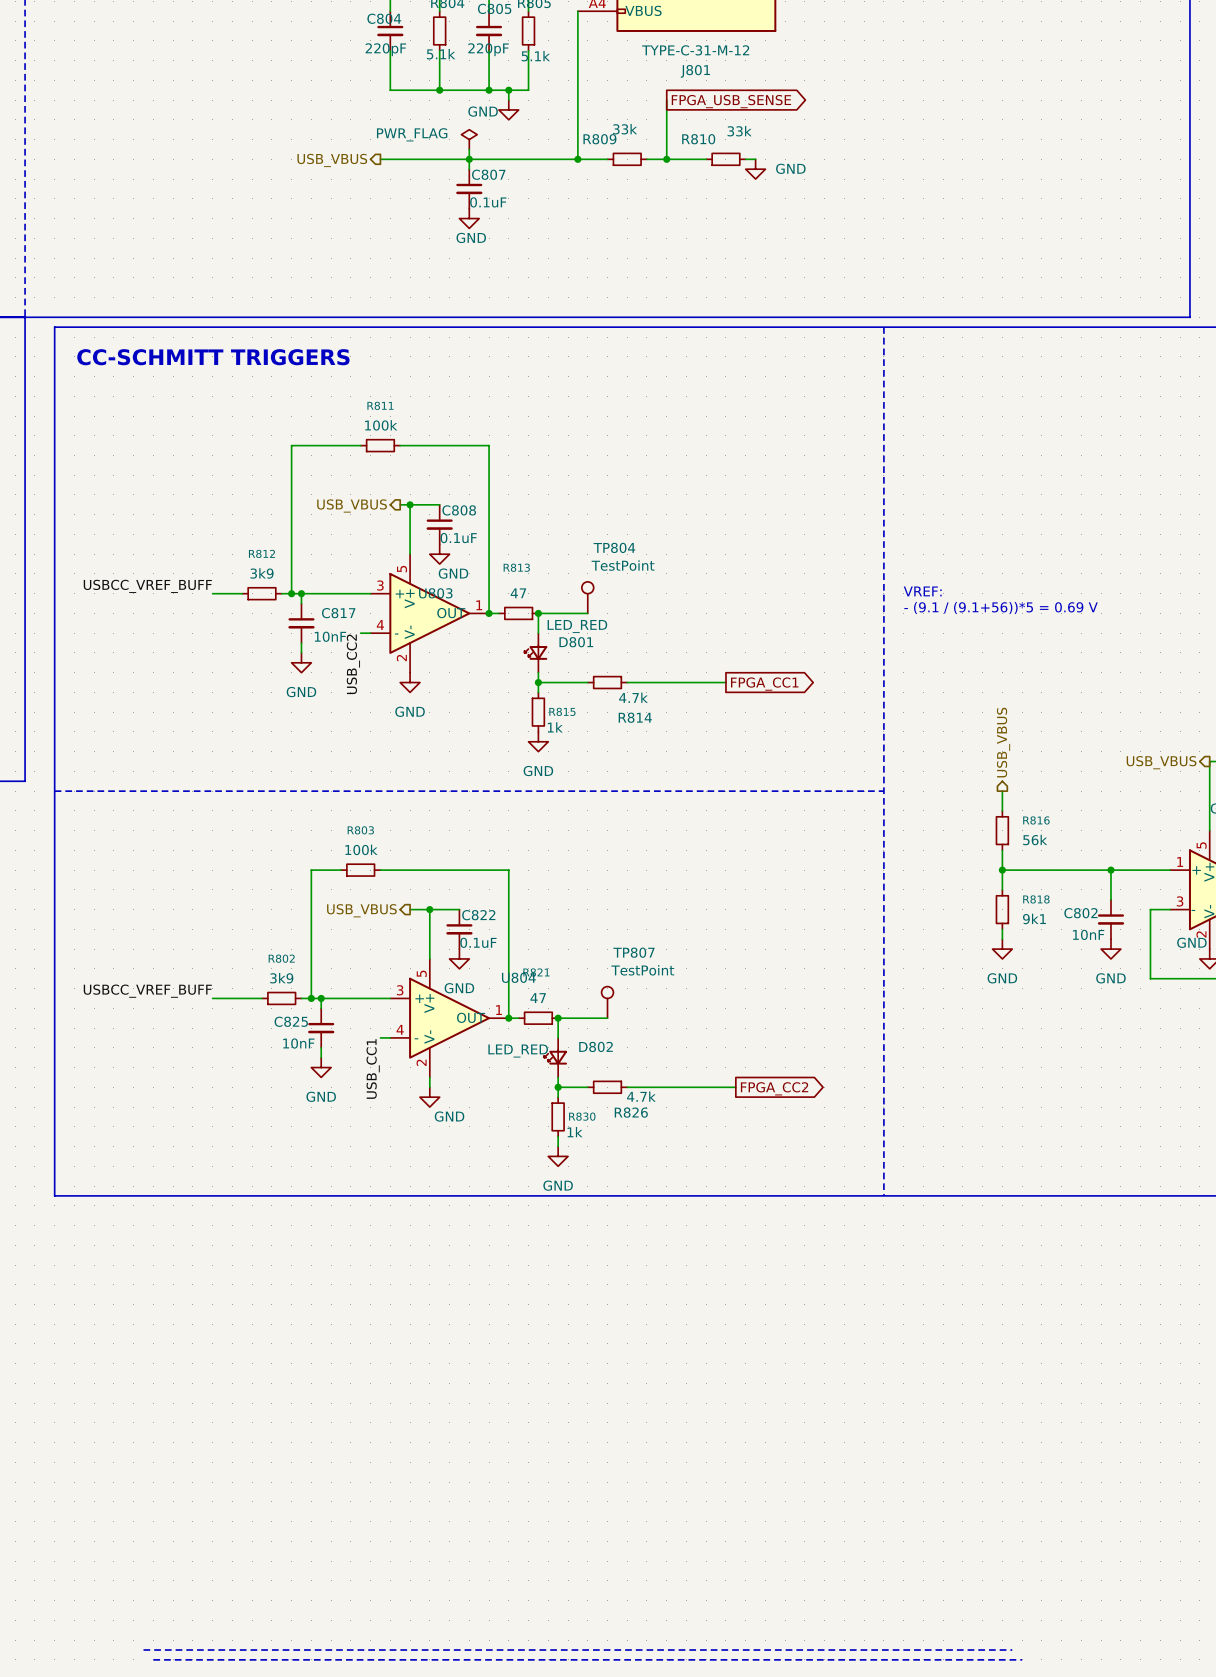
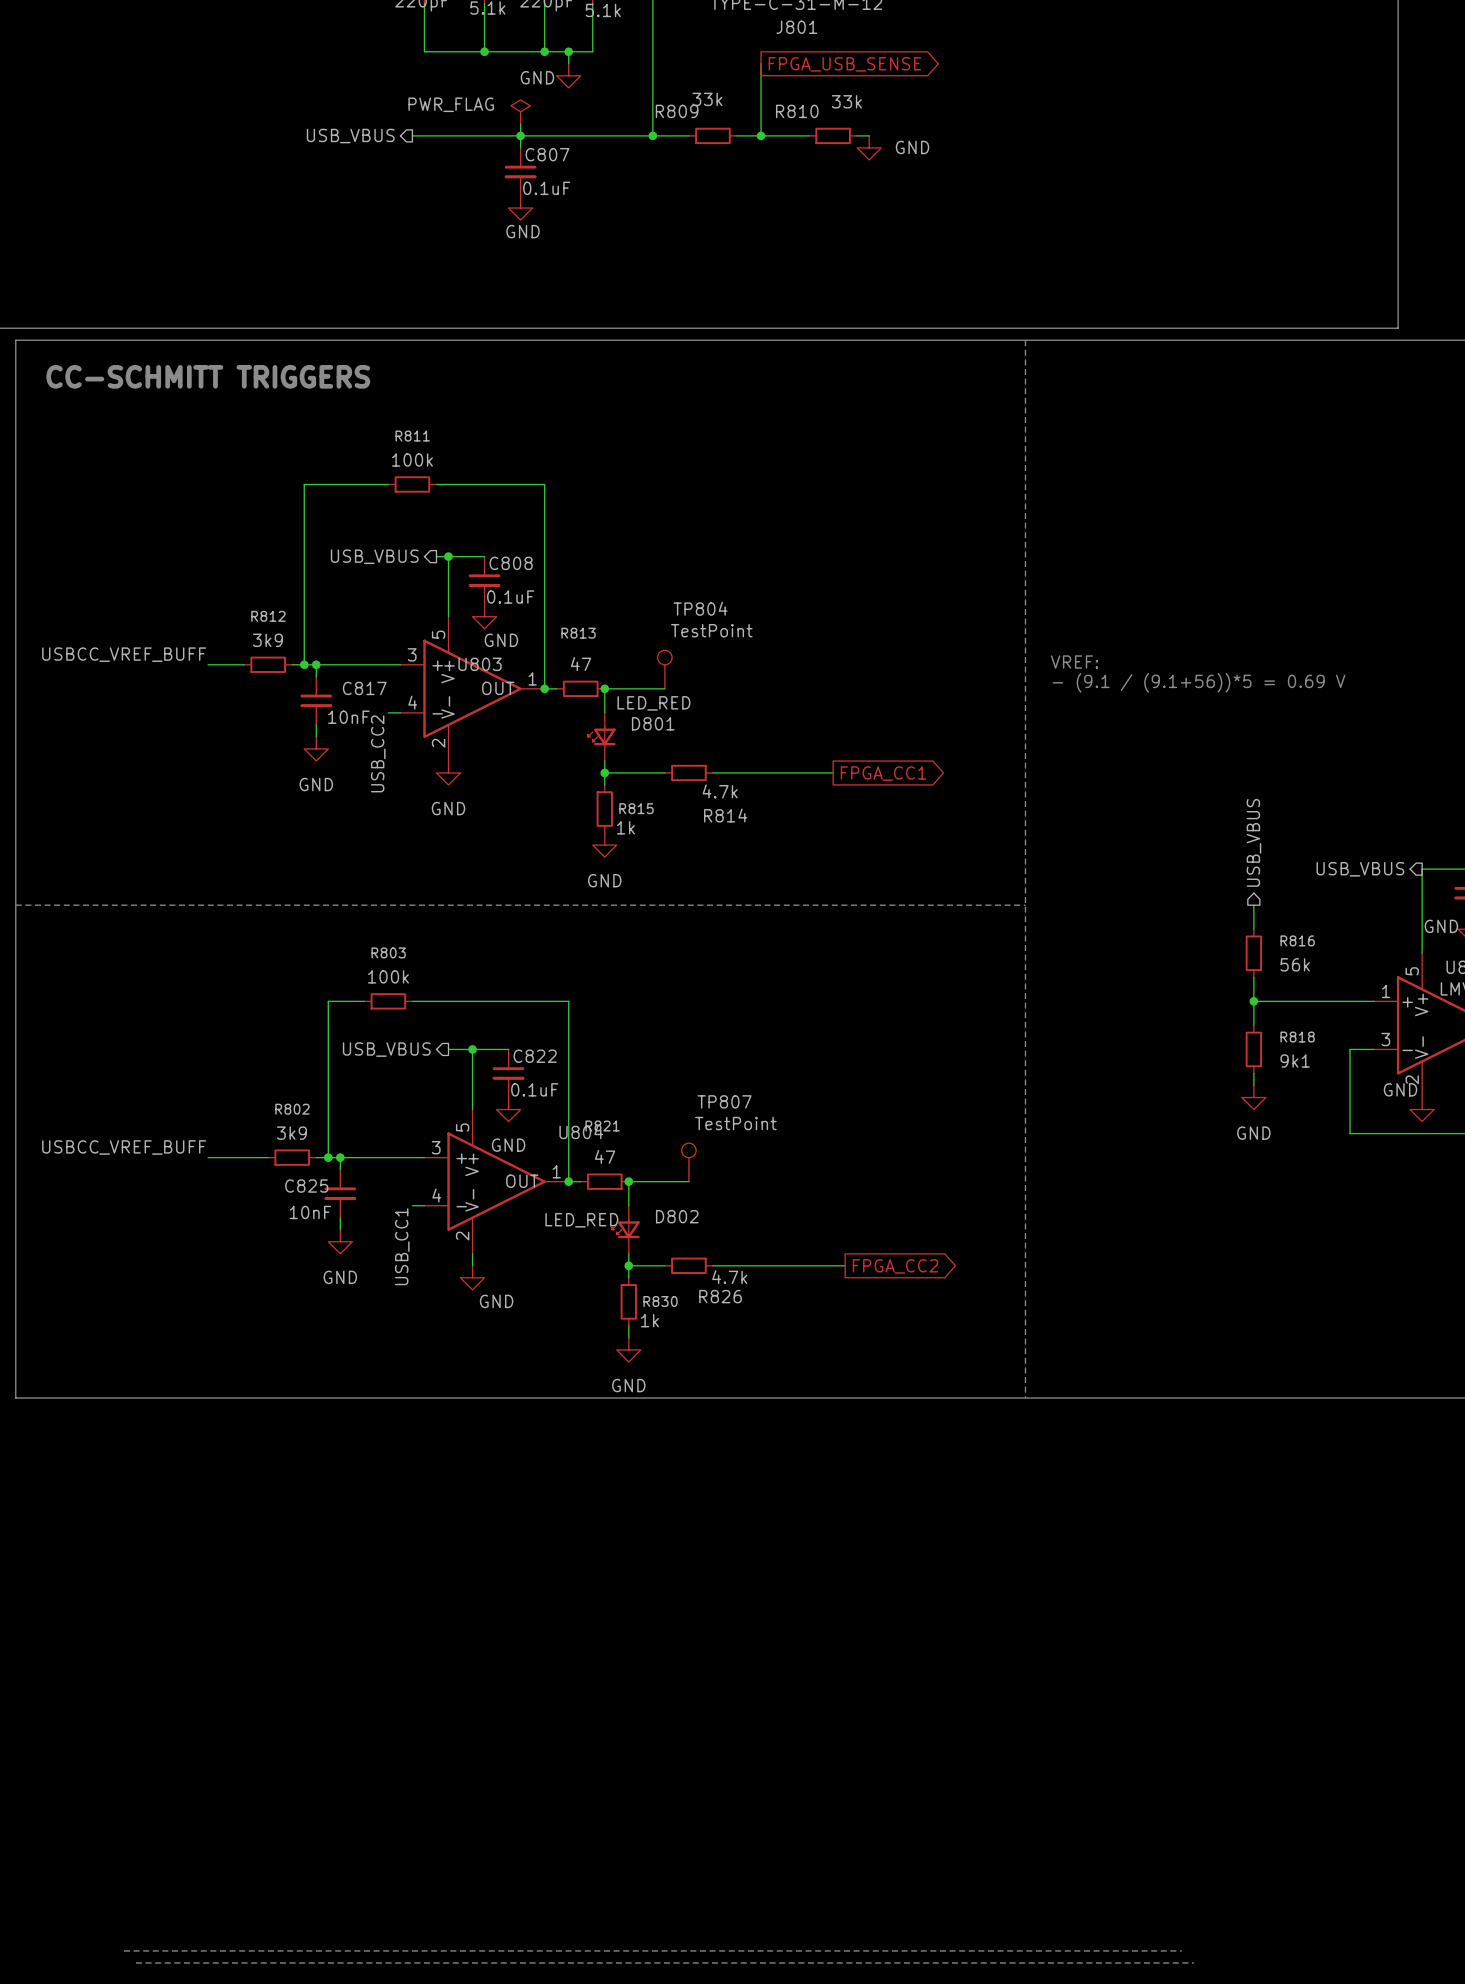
hierarchical label position: USB_VBUS (1003, 742) -> USB_VBUS (1253, 842)
wire: (1002, 791) (1002, 810) -> (1253, 905) (1253, 929)
R816 position: (1002, 830) -> (1253, 953)
wire: (1002, 850) (1002, 889) -> (1253, 977) (1253, 1025)
wire: (1002, 870) (1071, 870) -> none
junction: (1002, 870) -> none
junction: none -> (1253, 1001)
wire: (1110, 870) (1110, 899) -> none
junction: (1110, 870) -> none
R818 position: (1002, 909) -> (1253, 1049)
C802: 10nF (1110, 919) -> none
wire: (1002, 929) (1002, 939) -> (1253, 1073) (1253, 1085)
power symbol: GND (1002, 949) -> none
power symbol: none -> GND (1253, 1097)
power symbol: GND (1110, 949) -> none

